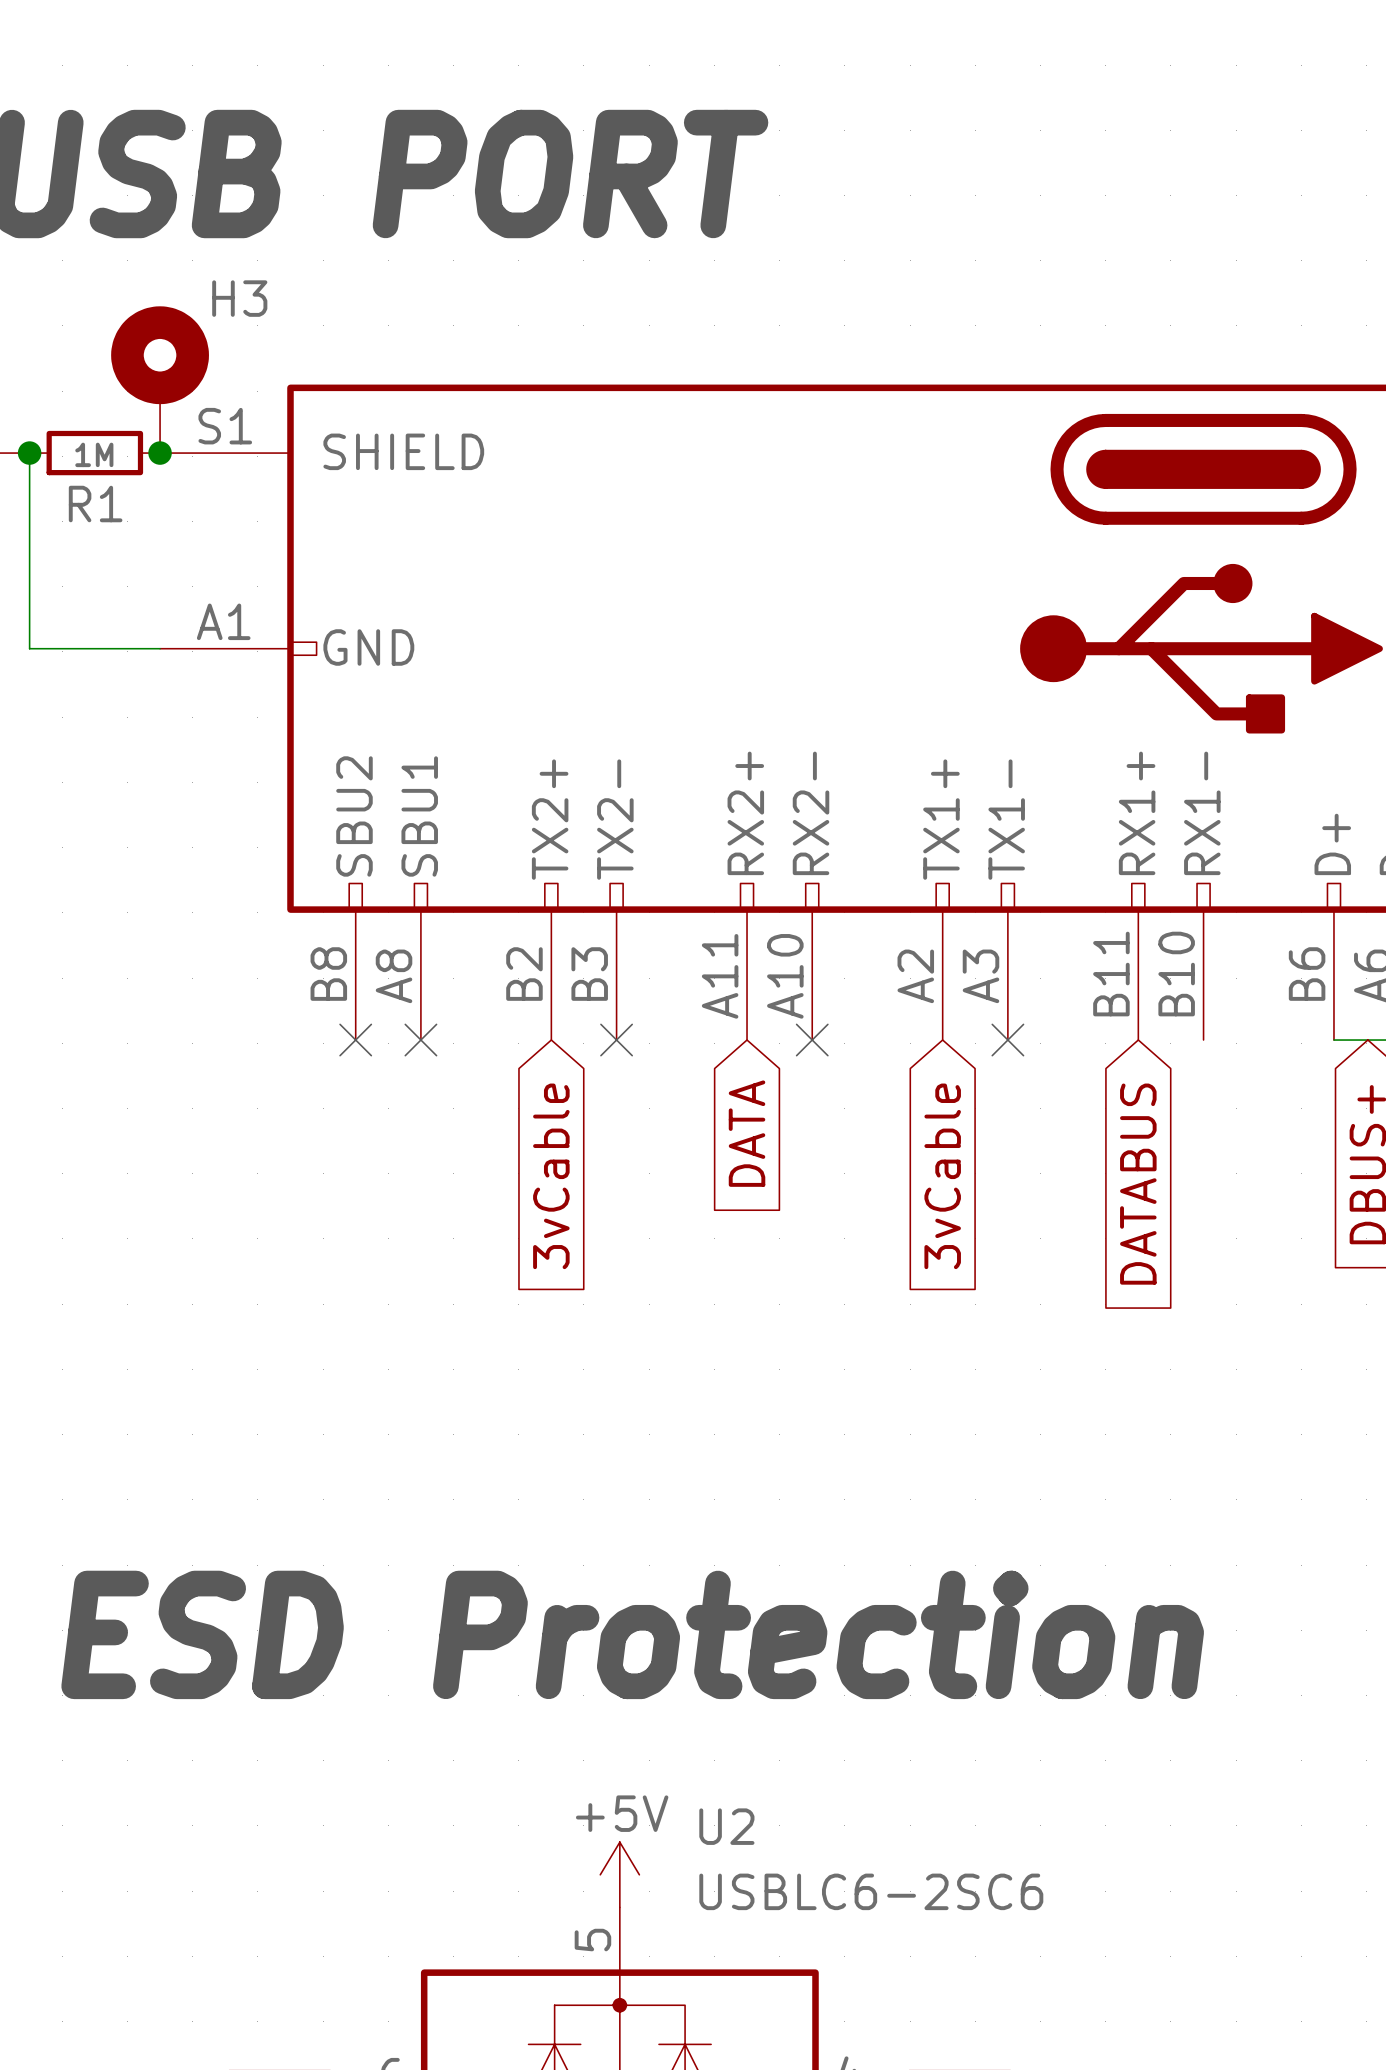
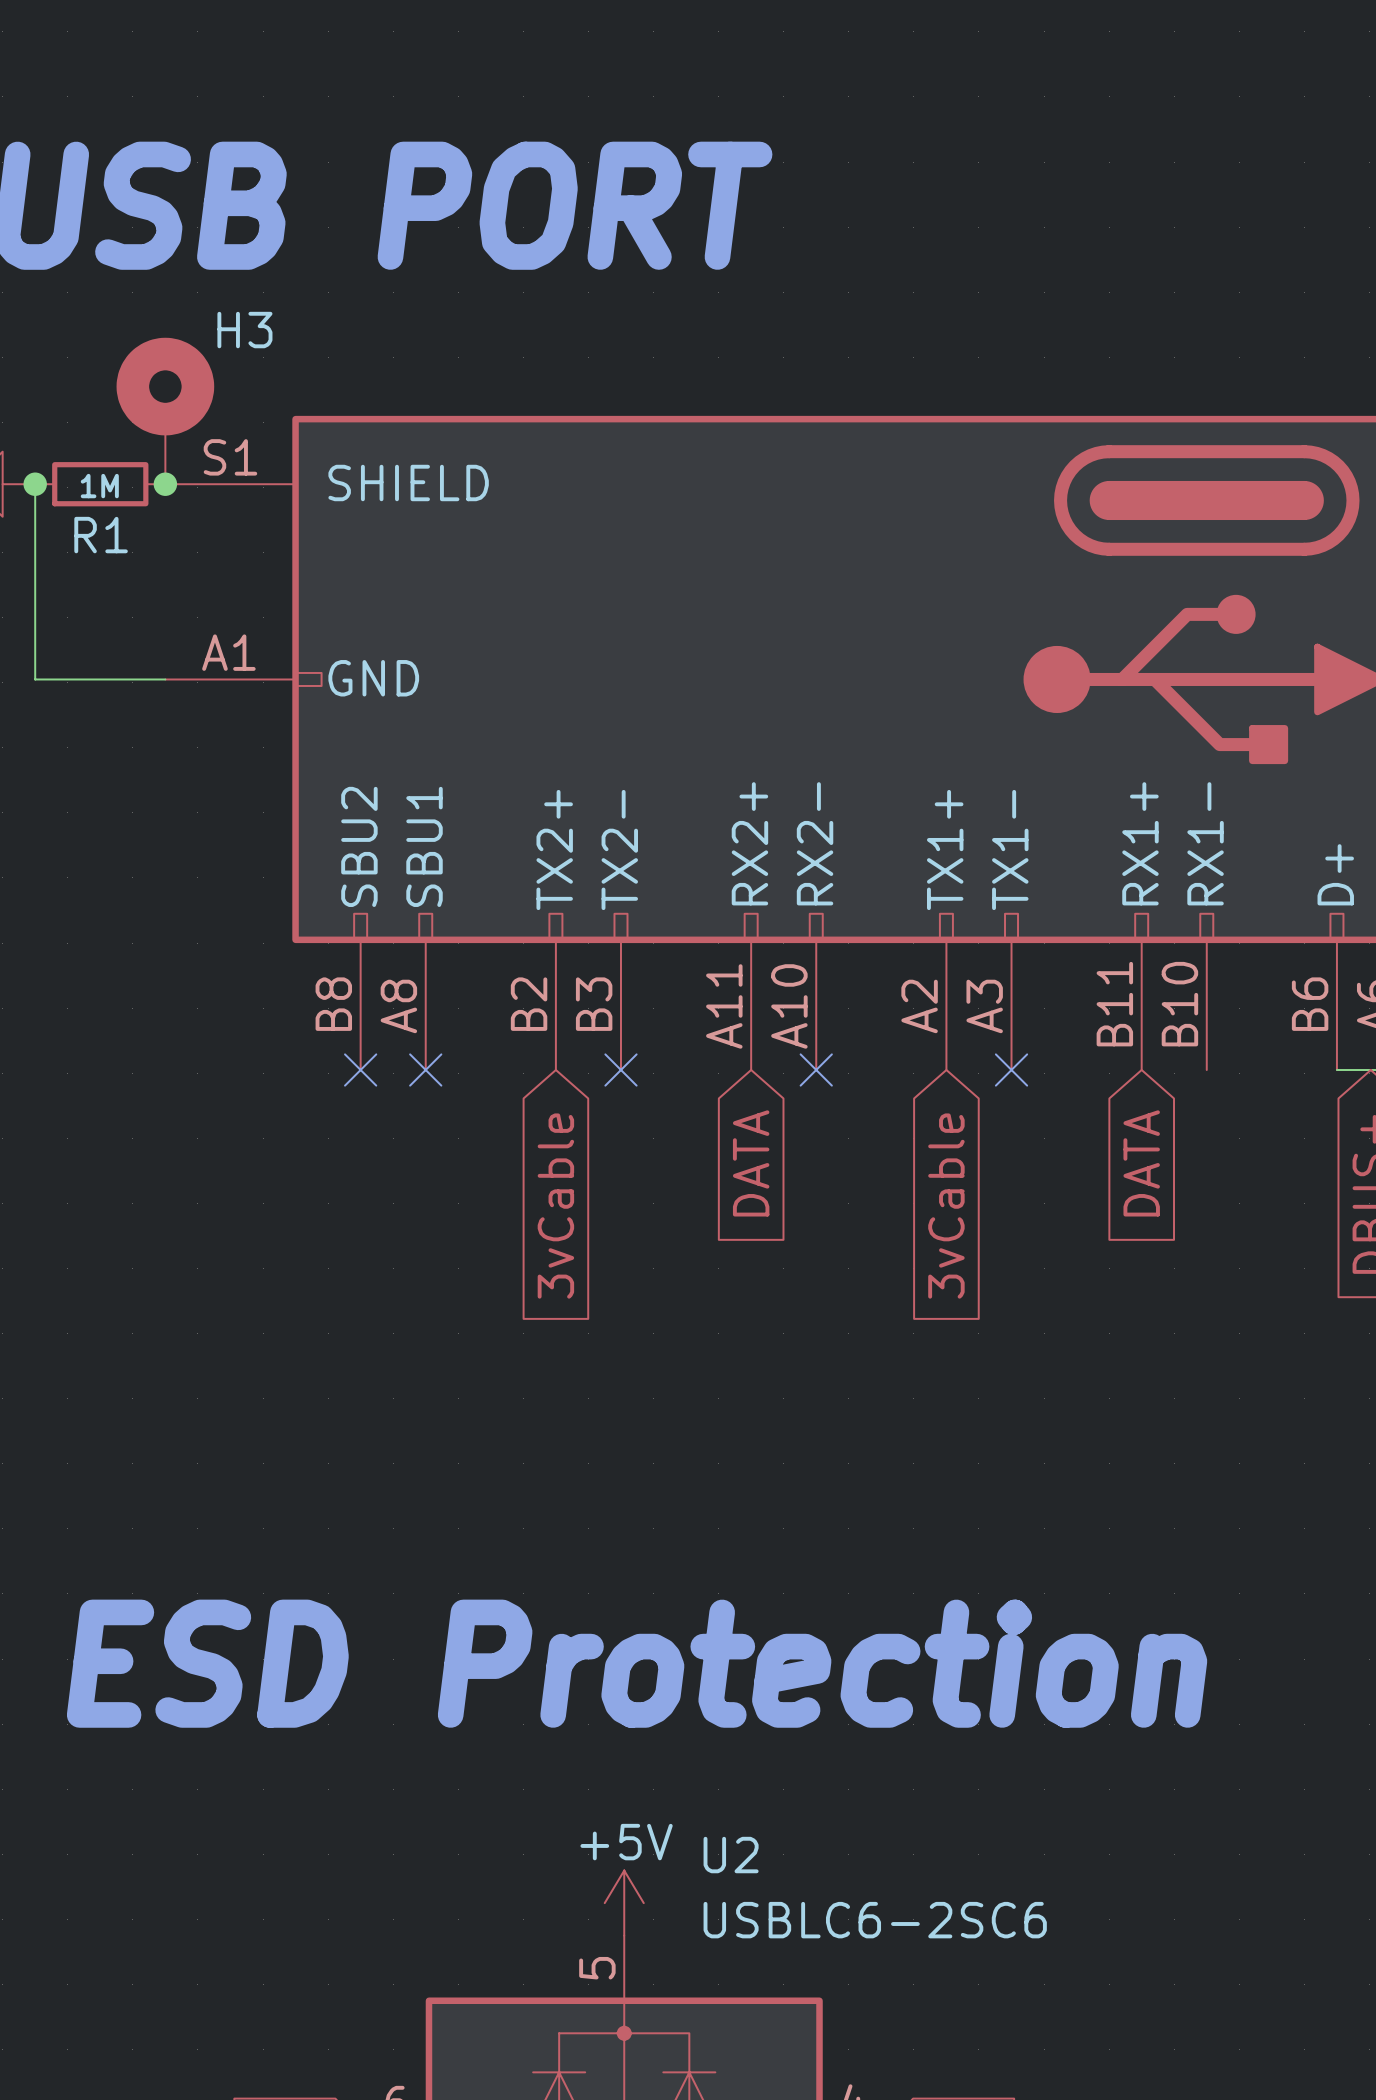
global label: DATABUS (1138, 1184) -> DATA (1141, 1163)

